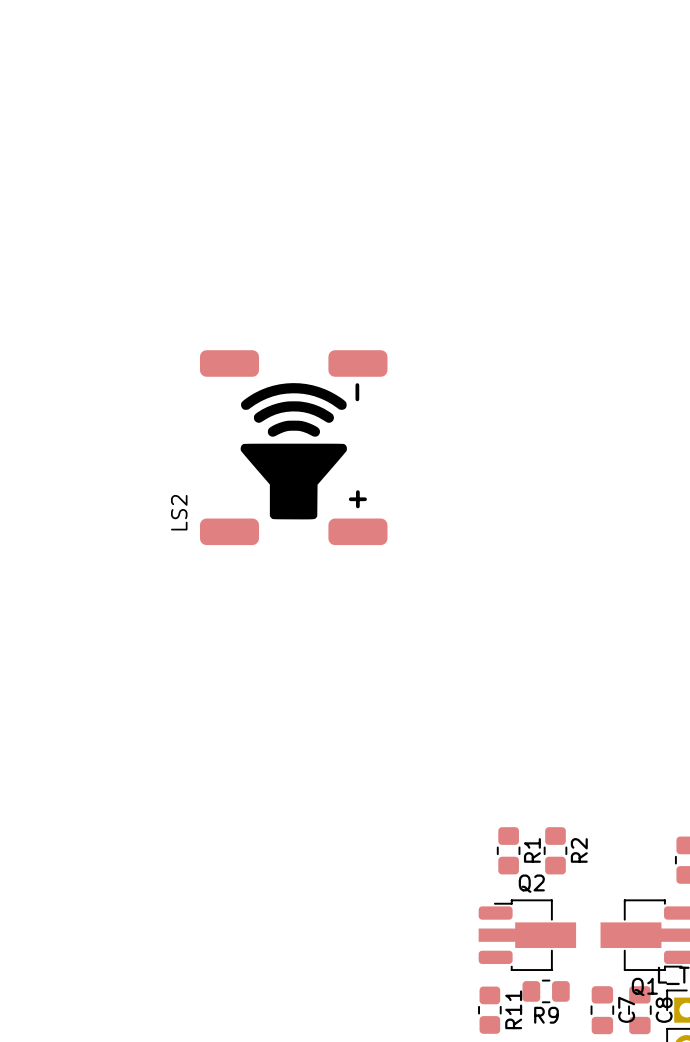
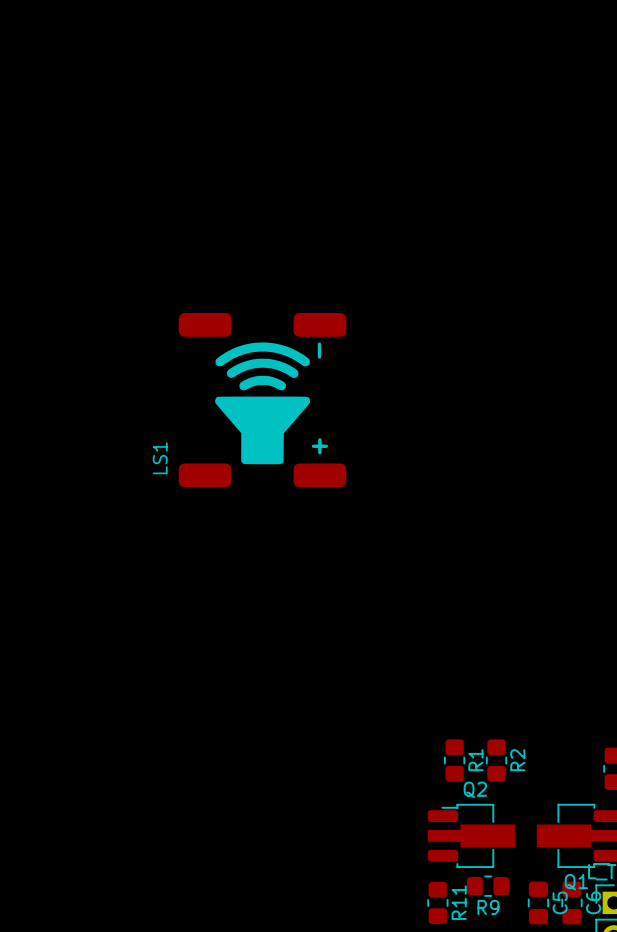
LS2 name: LS2 (179, 512) -> LS1 (160, 458)
C7 name: C7 (626, 1009) -> C5 (560, 902)
C8 name: C8 (664, 1010) -> C6 (593, 902)

